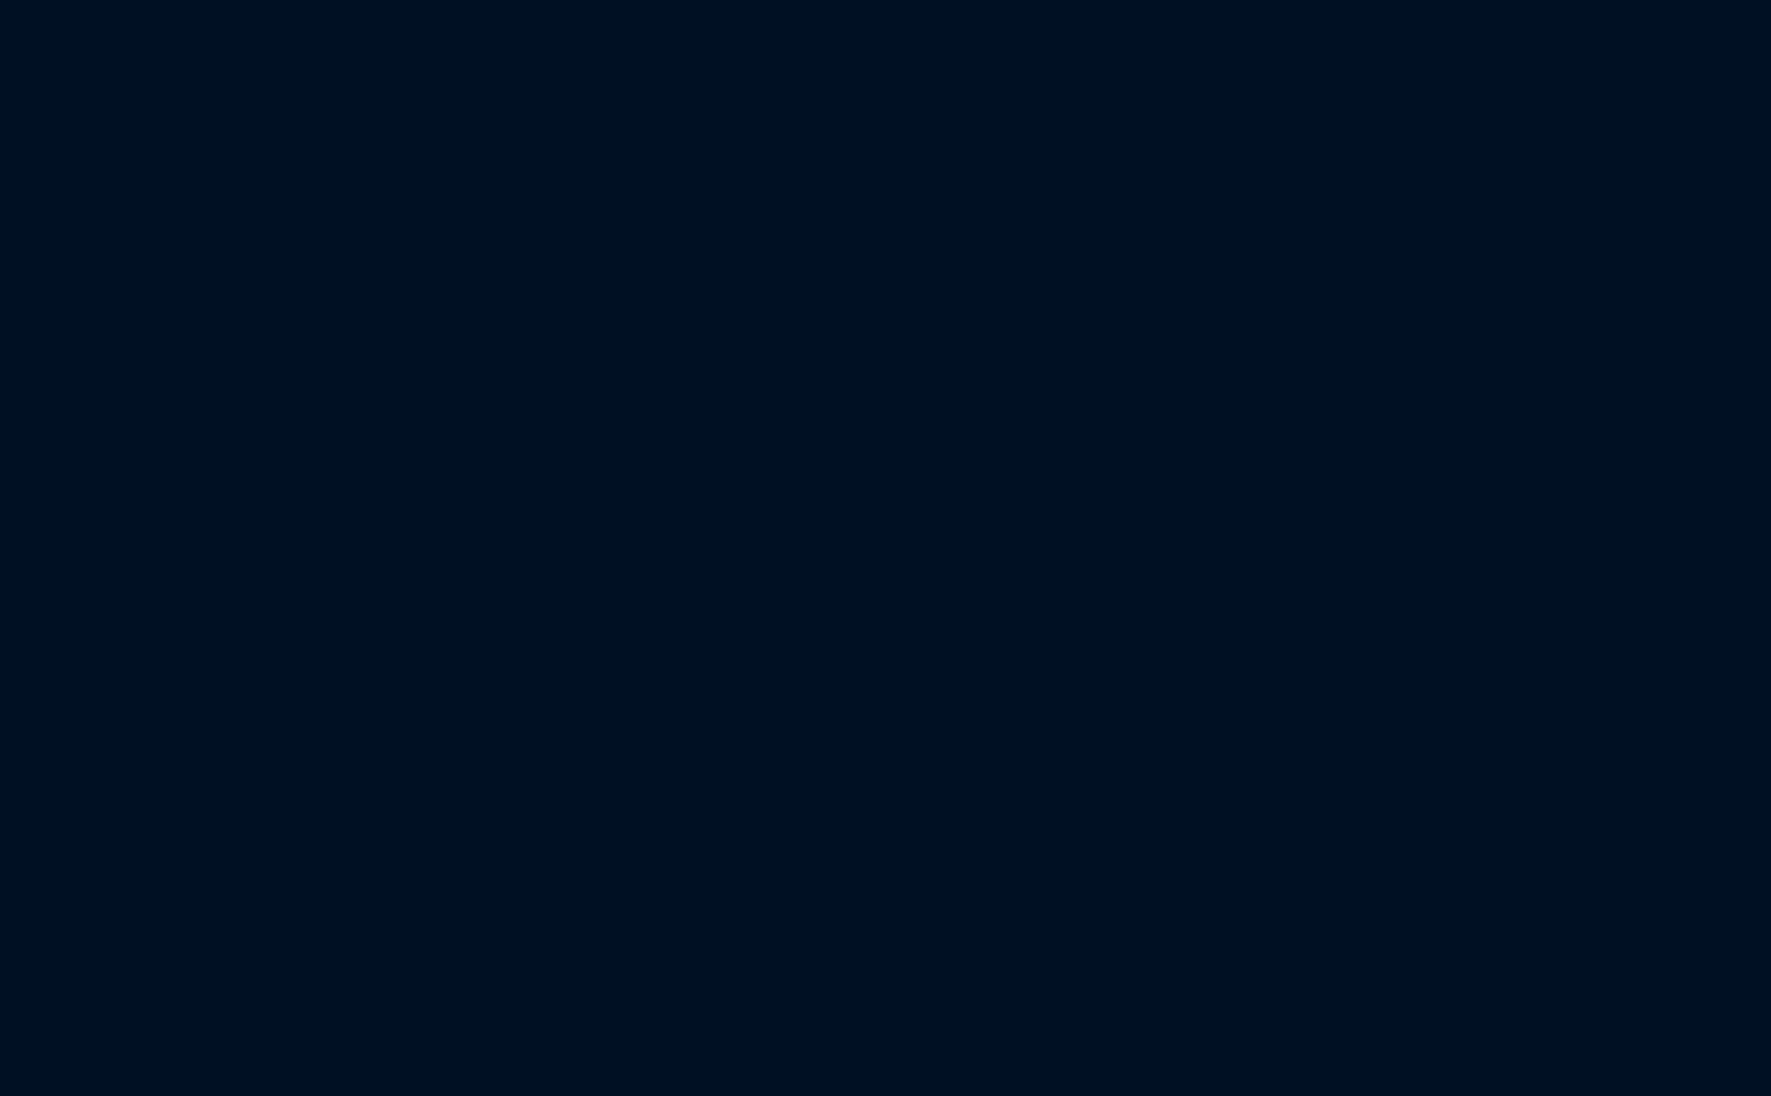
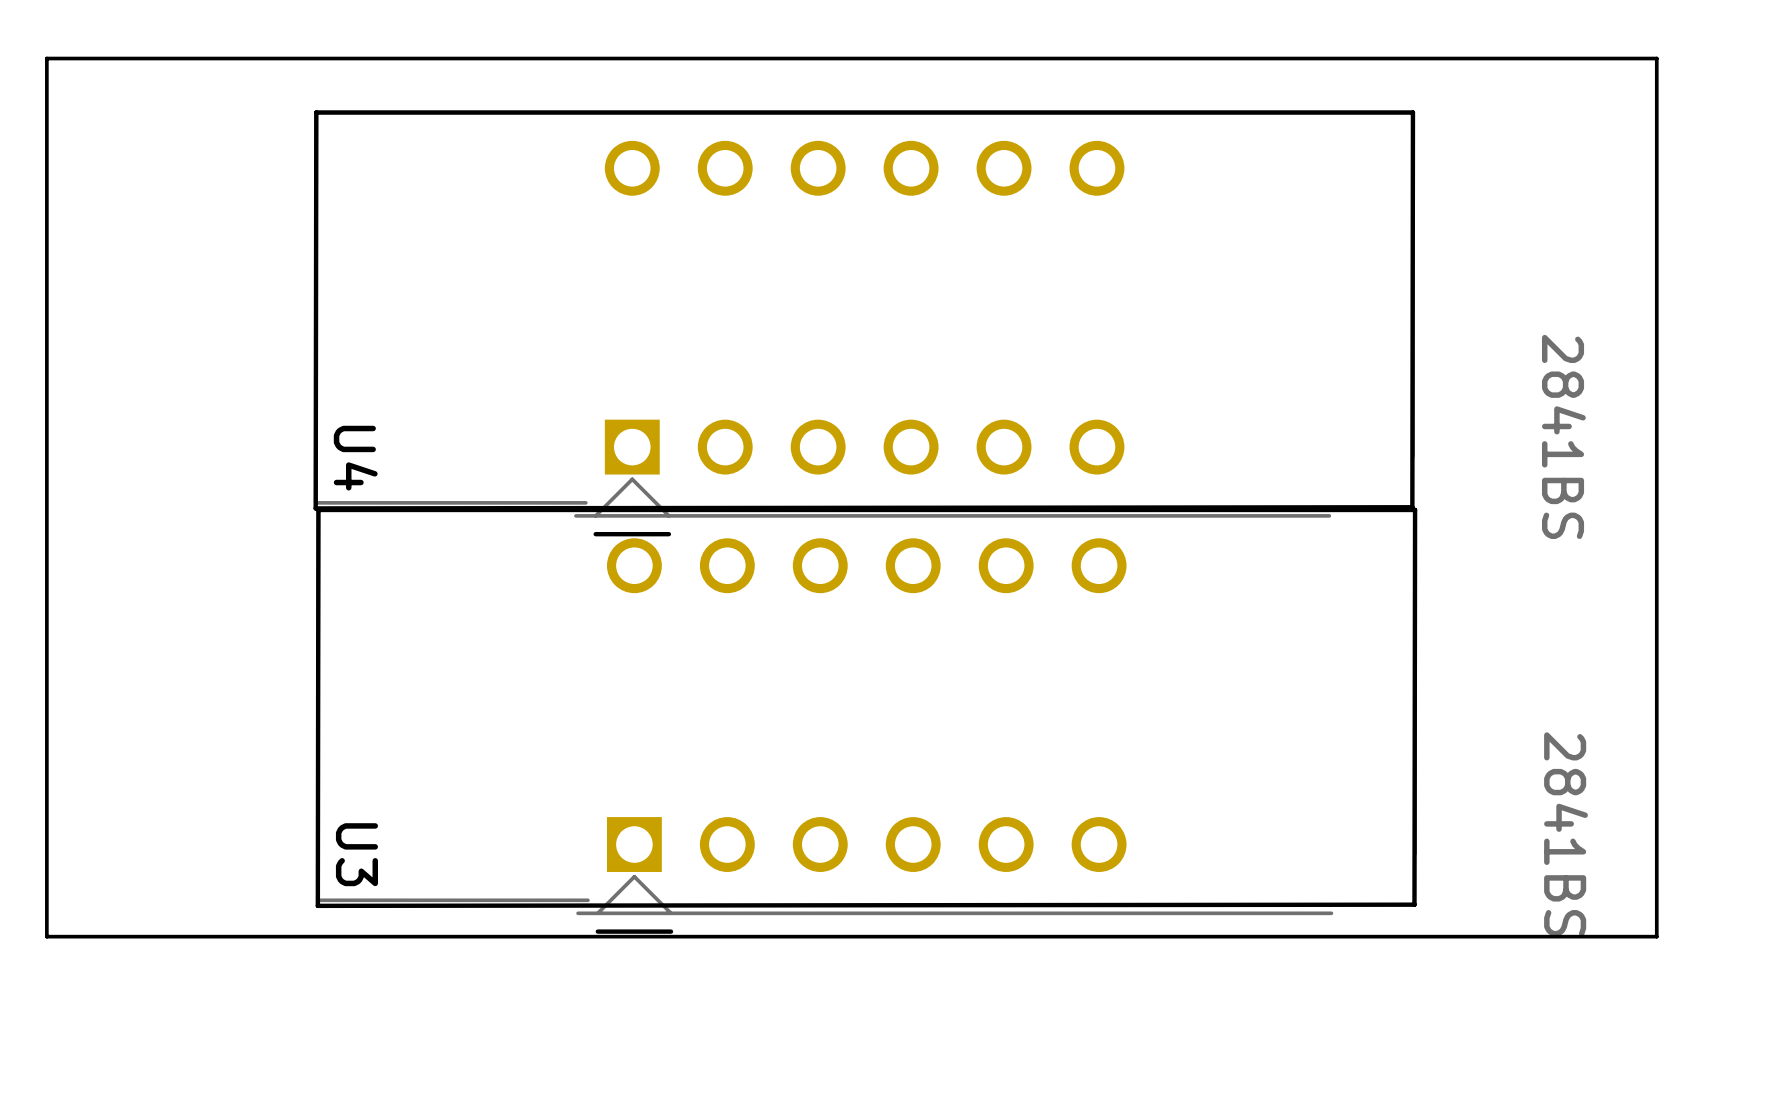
board edge: none -> (1656, 58) (46, 58) (46, 936) (1656, 936) (1656, 58)
U4: none -> 2841BS (864, 323)
U3: none -> 2841BS (866, 720)

